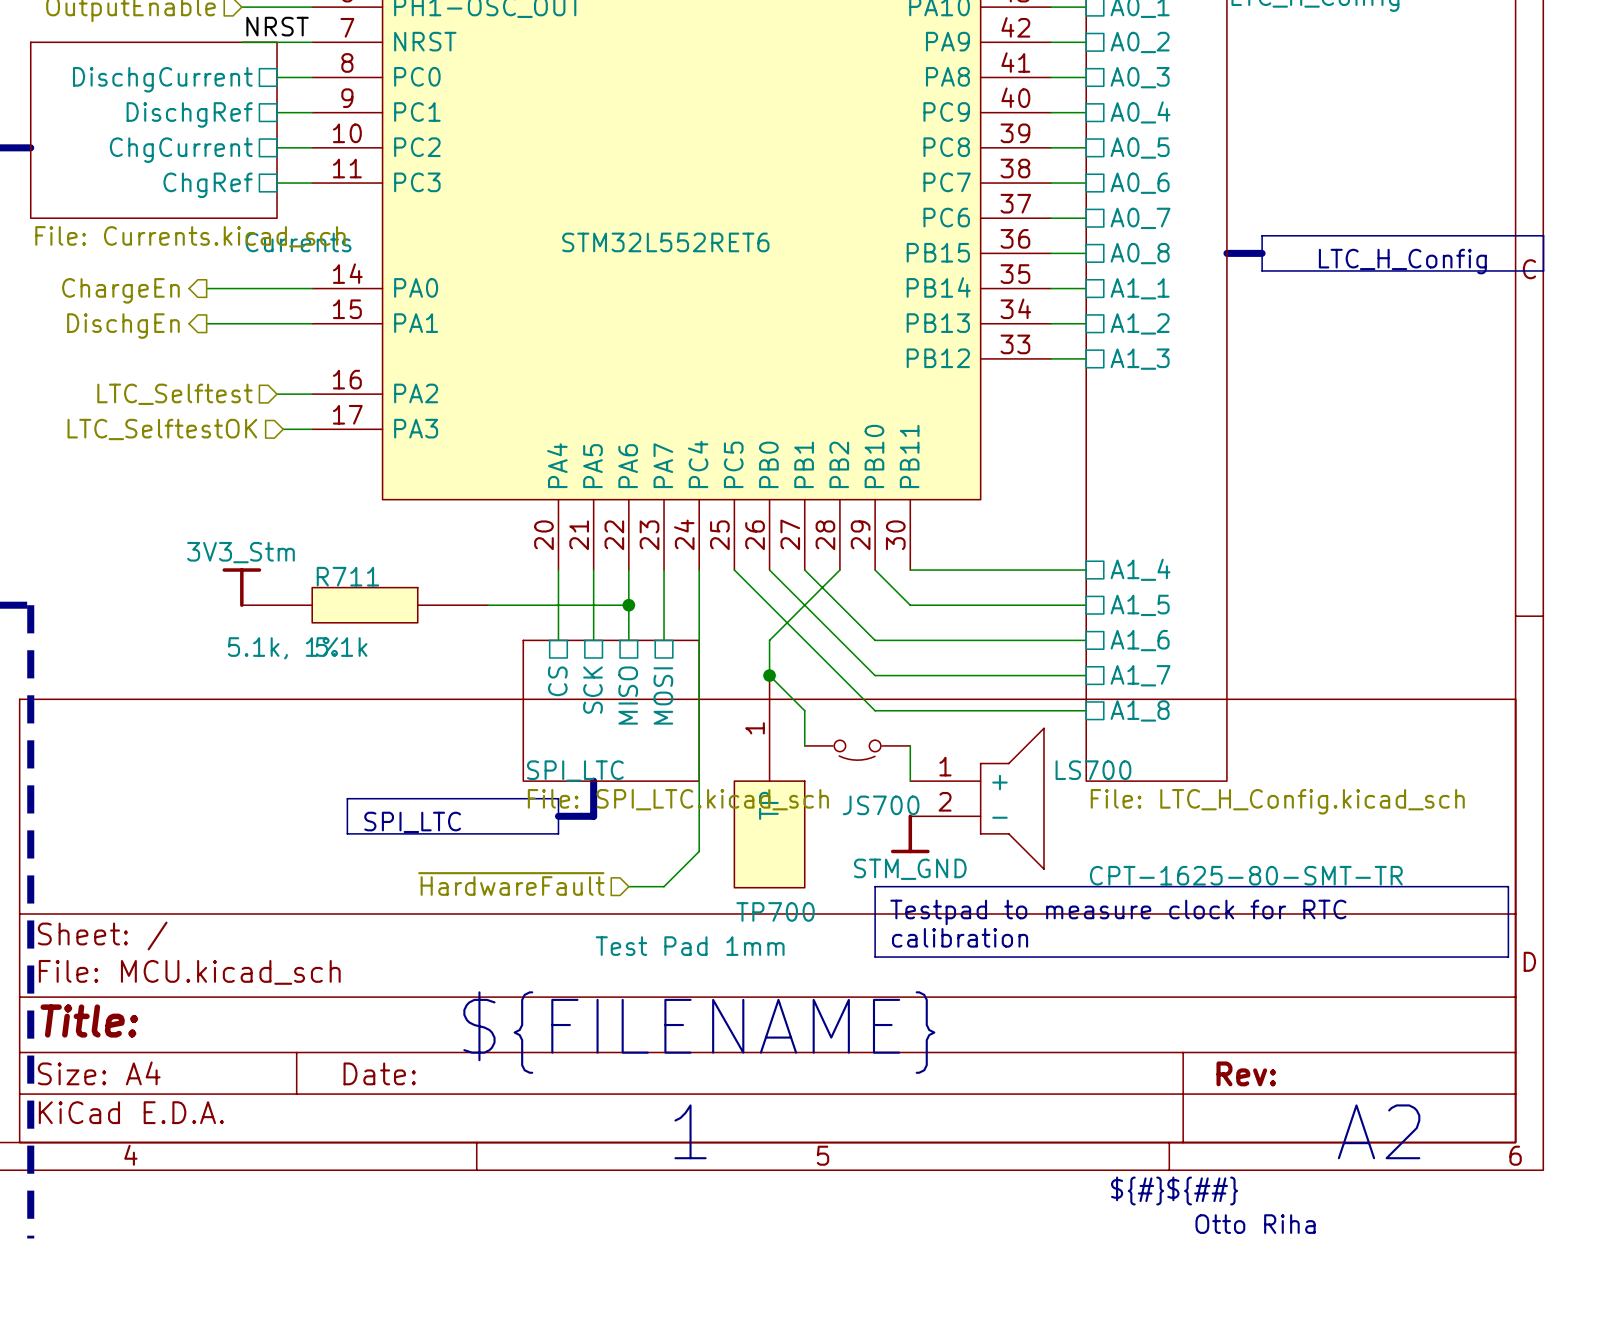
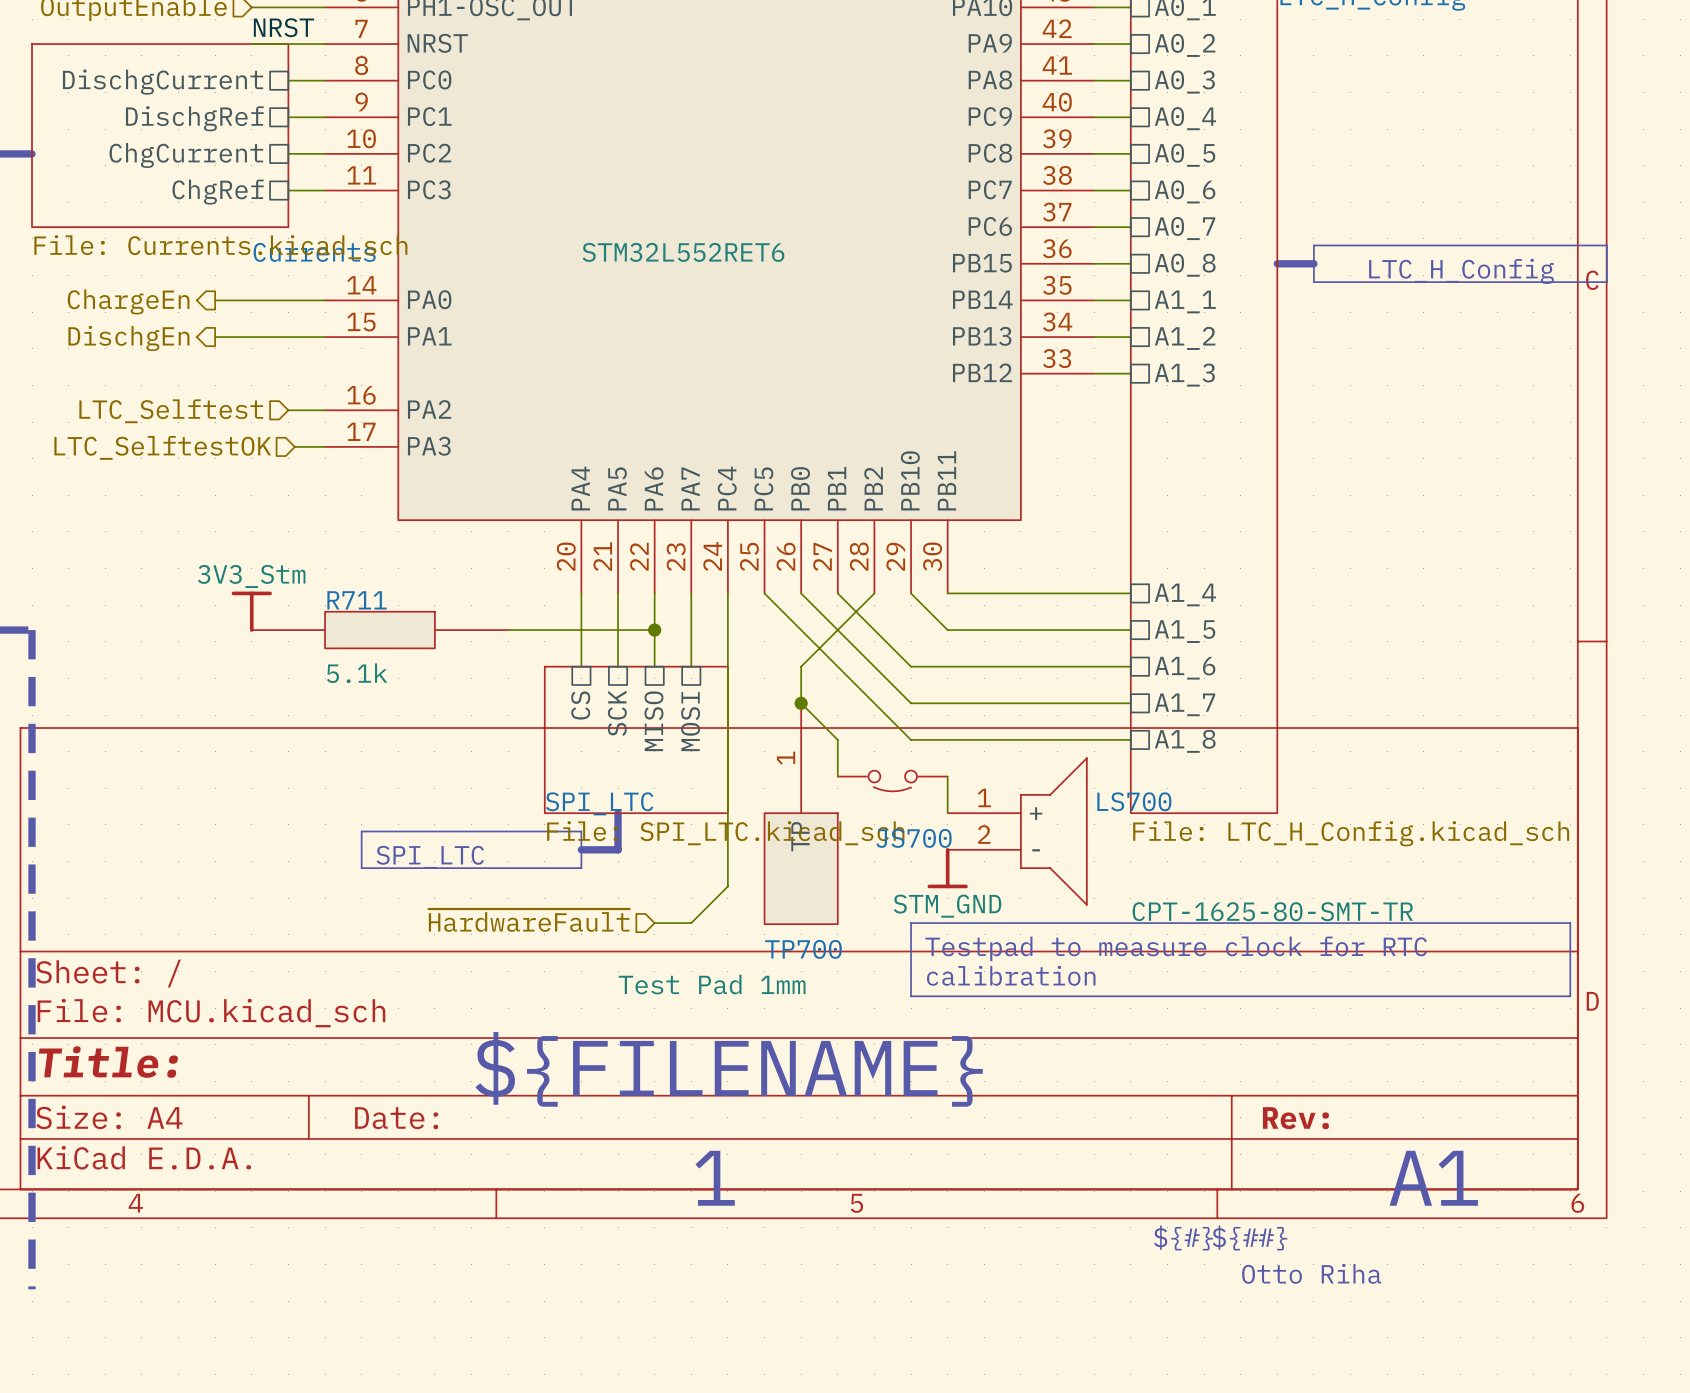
R711 value: 5.1k, 1% (283, 648) -> none
text: A2 (1379, 1131) -> A1 (1433, 1178)

